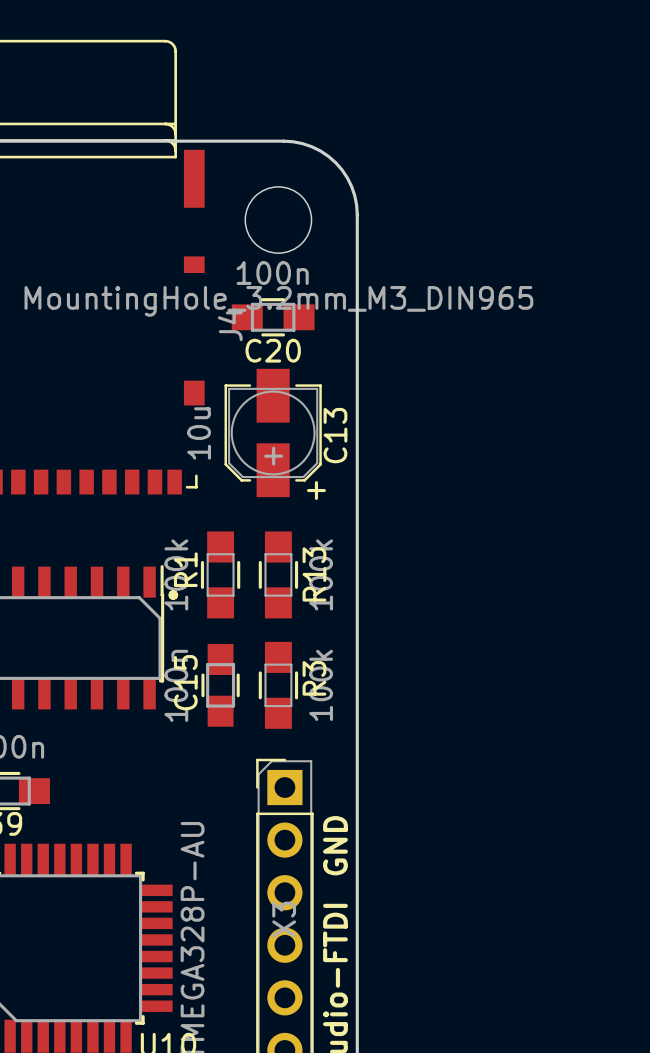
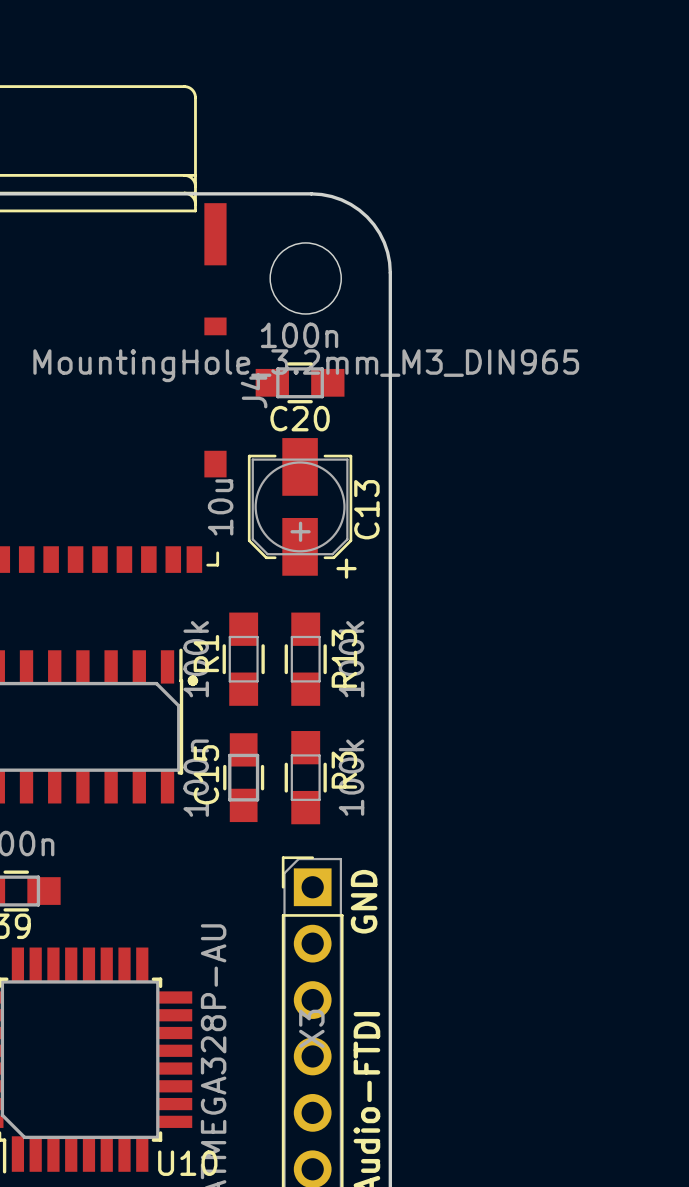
text position: GND (335, 845) -> GND (364, 901)

